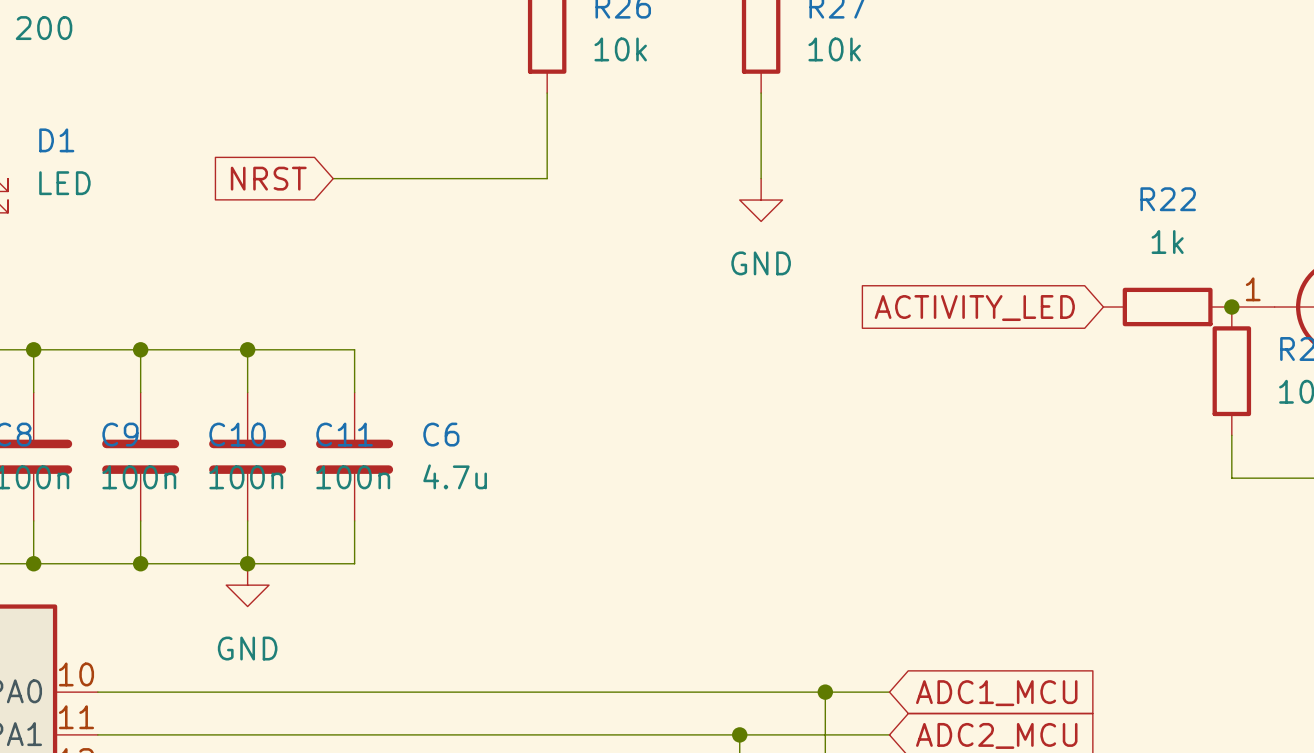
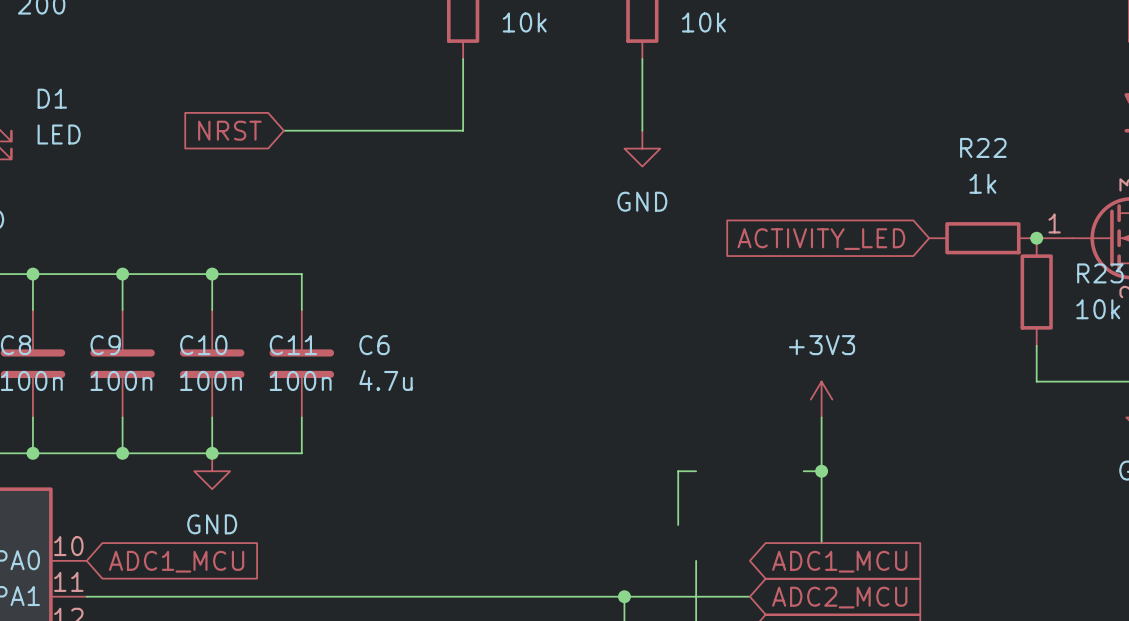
power symbol: none -> +3V3 (821, 399)
wire: none -> (821, 417) (821, 542)
wire: none -> (696, 471) (678, 471) (678, 525)
wire: none -> (803, 471) (821, 471)
junction: none -> (821, 471)
wire: (97, 692) (889, 692) -> none
junction: (825, 692) -> none
global label: none -> ADC1_MCU (176, 561)

